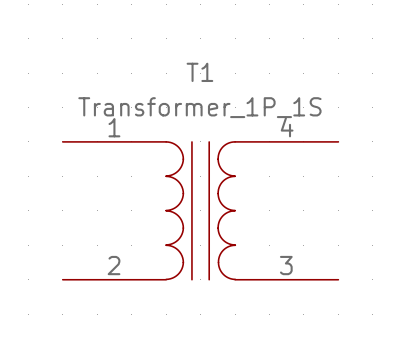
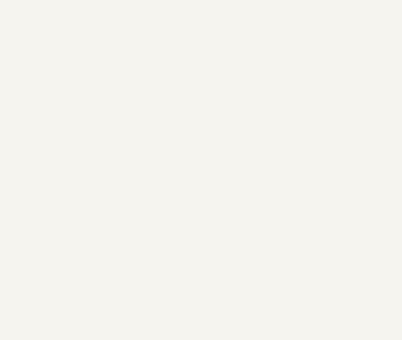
T1: Transformer_1P_1S (200, 210) -> none

